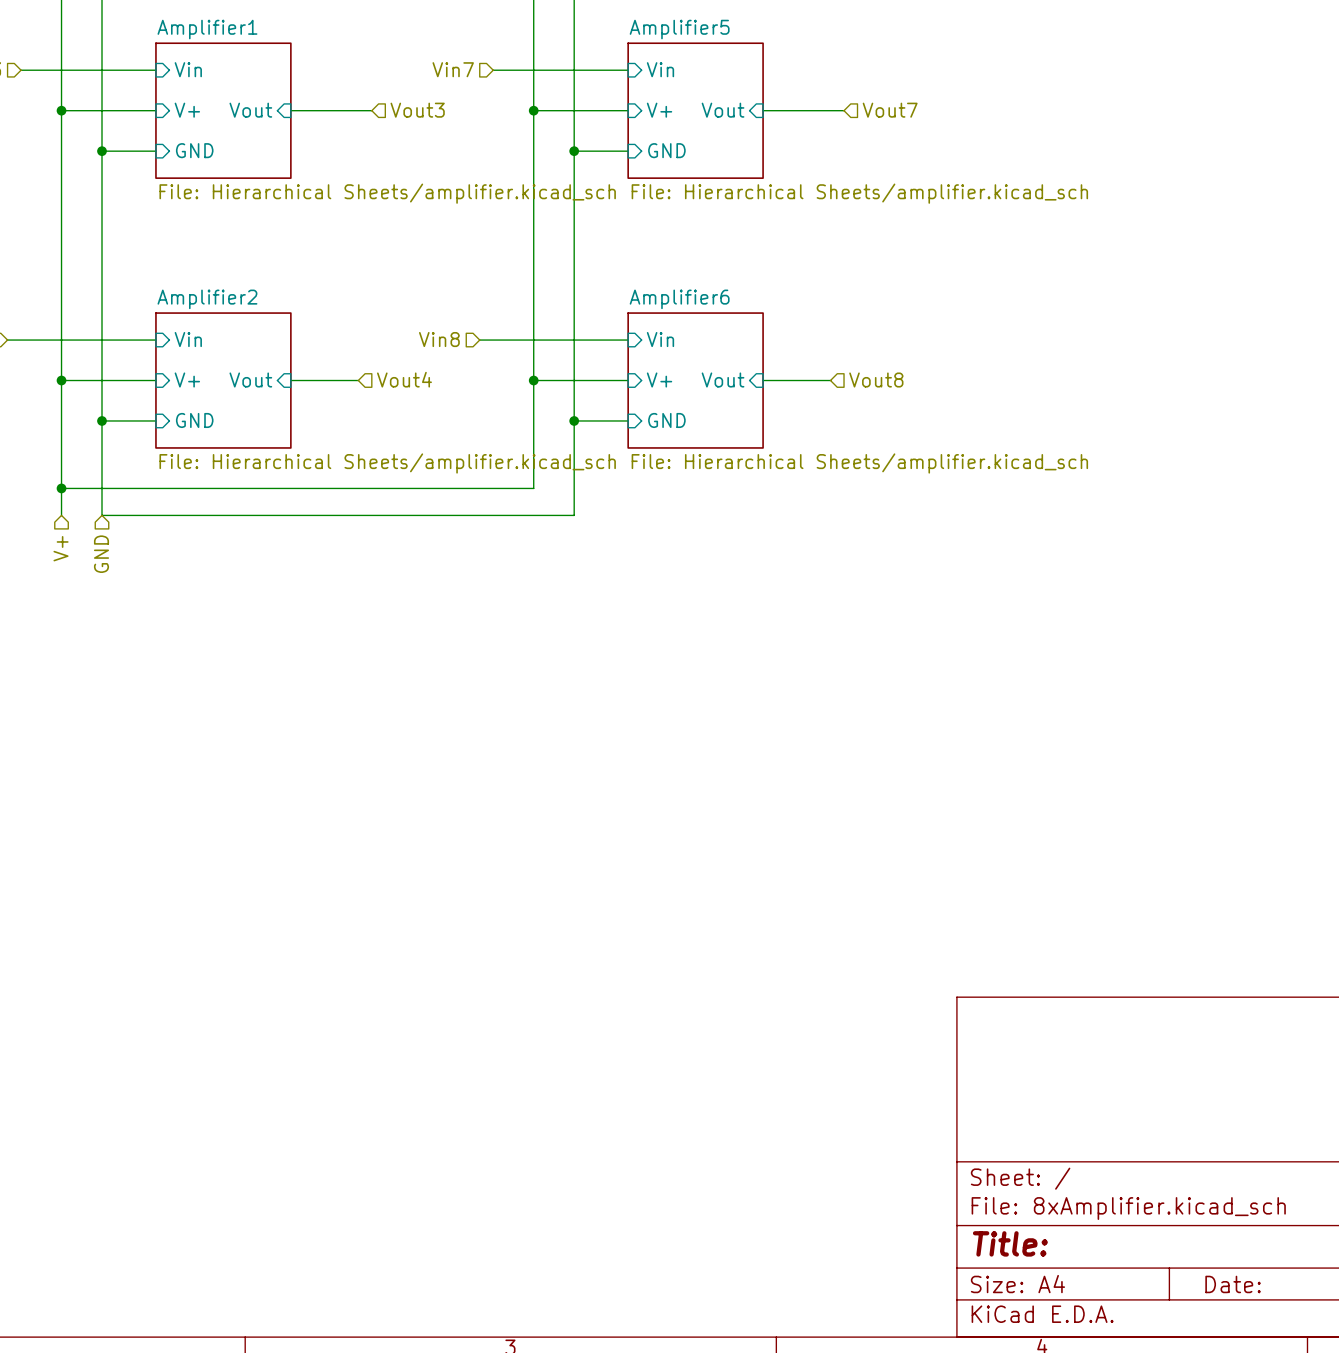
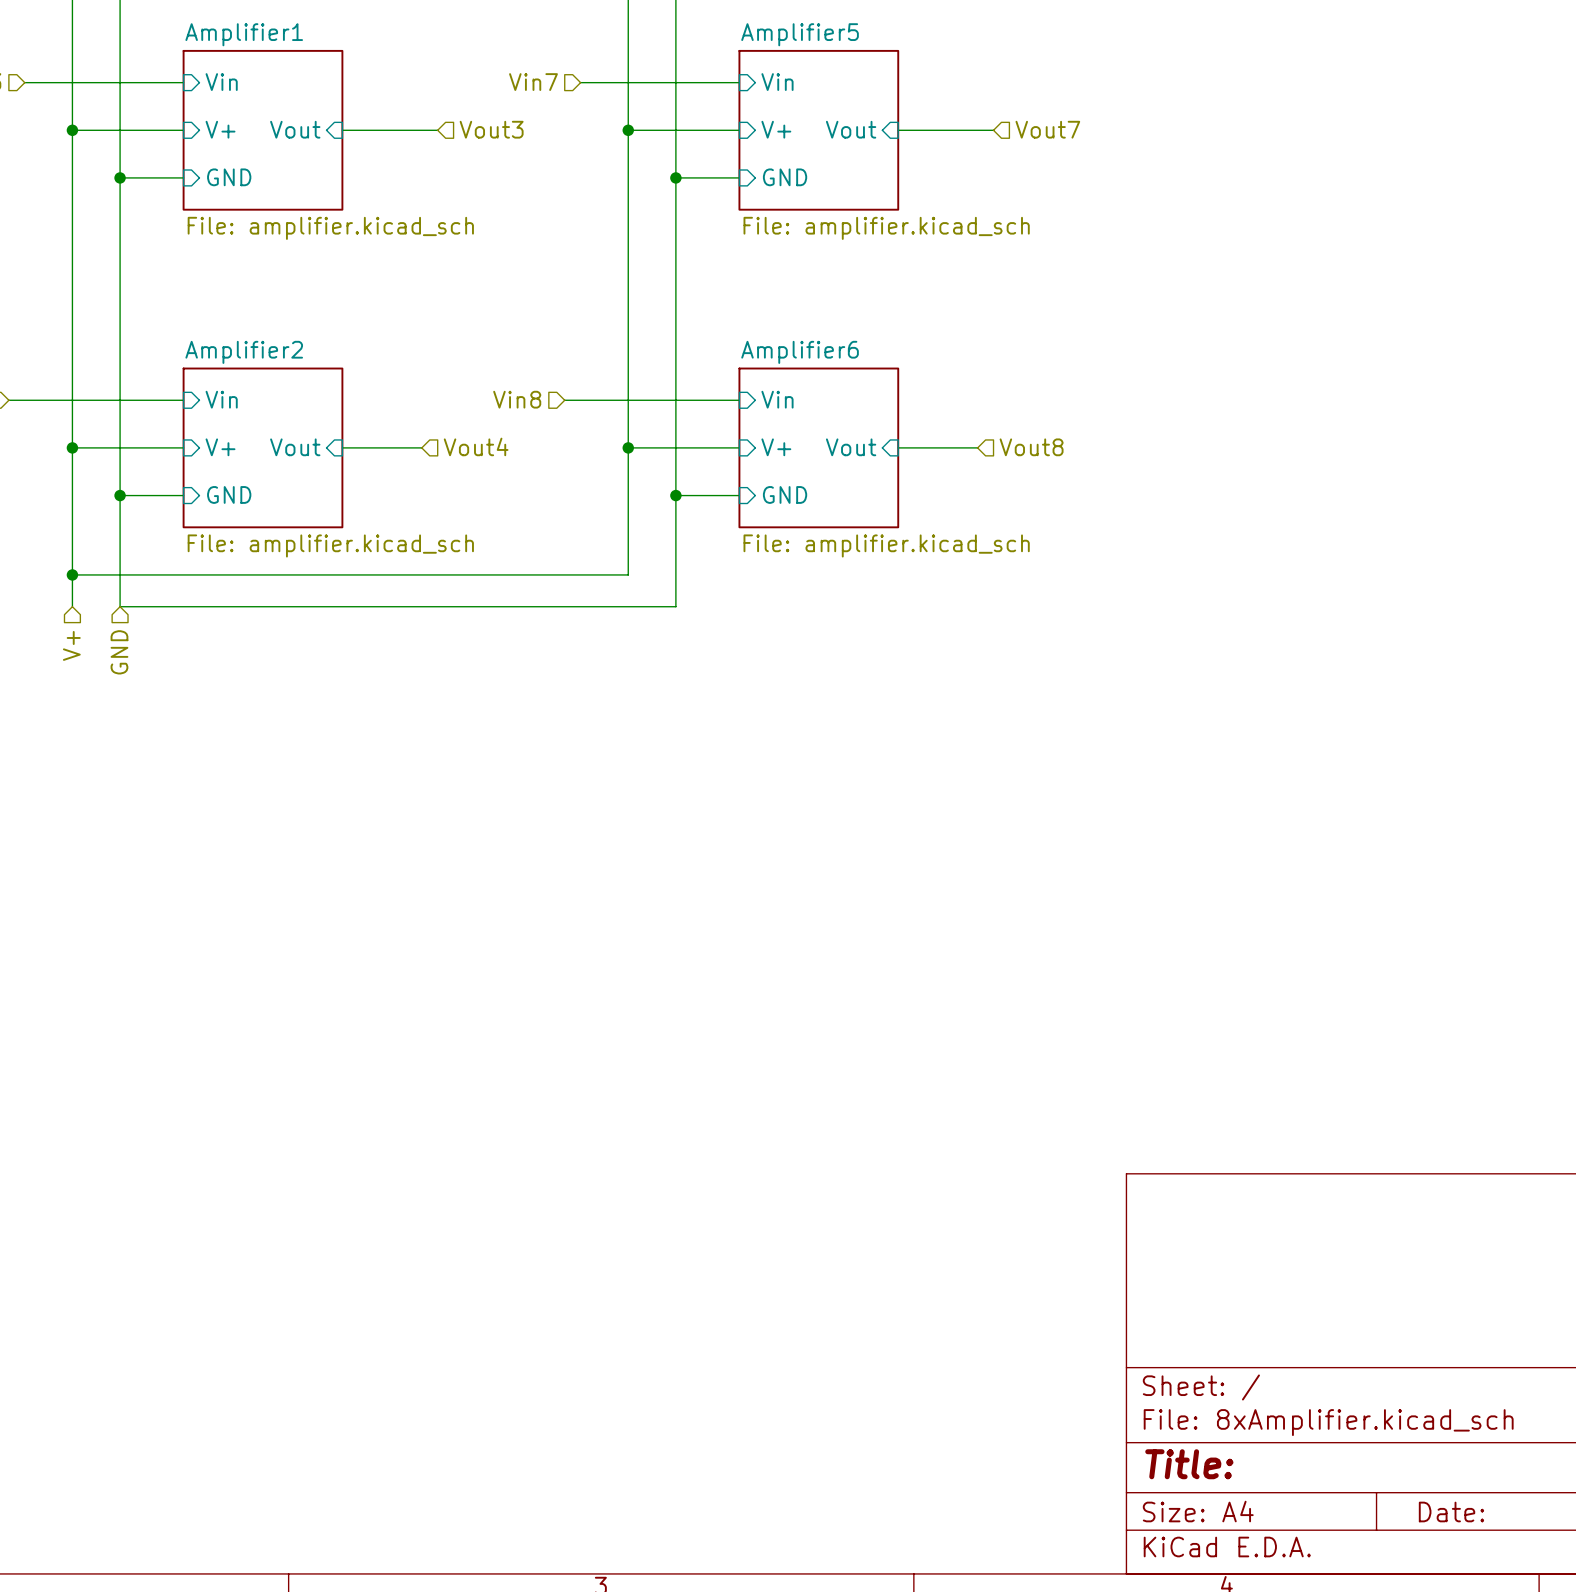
sheet Amplifier1 value: File: Hierarchical Sheets/amplifier.kicad_sch (387, 193) -> File: amplifier.kicad_sch (330, 228)
sheet Amplifier5 value: File: Hierarchical Sheets/amplifier.kicad_sch (859, 193) -> File: amplifier.kicad_sch (886, 228)
sheet Amplifier2 value: File: Hierarchical Sheets/amplifier.kicad_sch (387, 463) -> File: amplifier.kicad_sch (330, 545)
sheet Amplifier6 value: File: Hierarchical Sheets/amplifier.kicad_sch (859, 463) -> File: amplifier.kicad_sch (886, 545)

